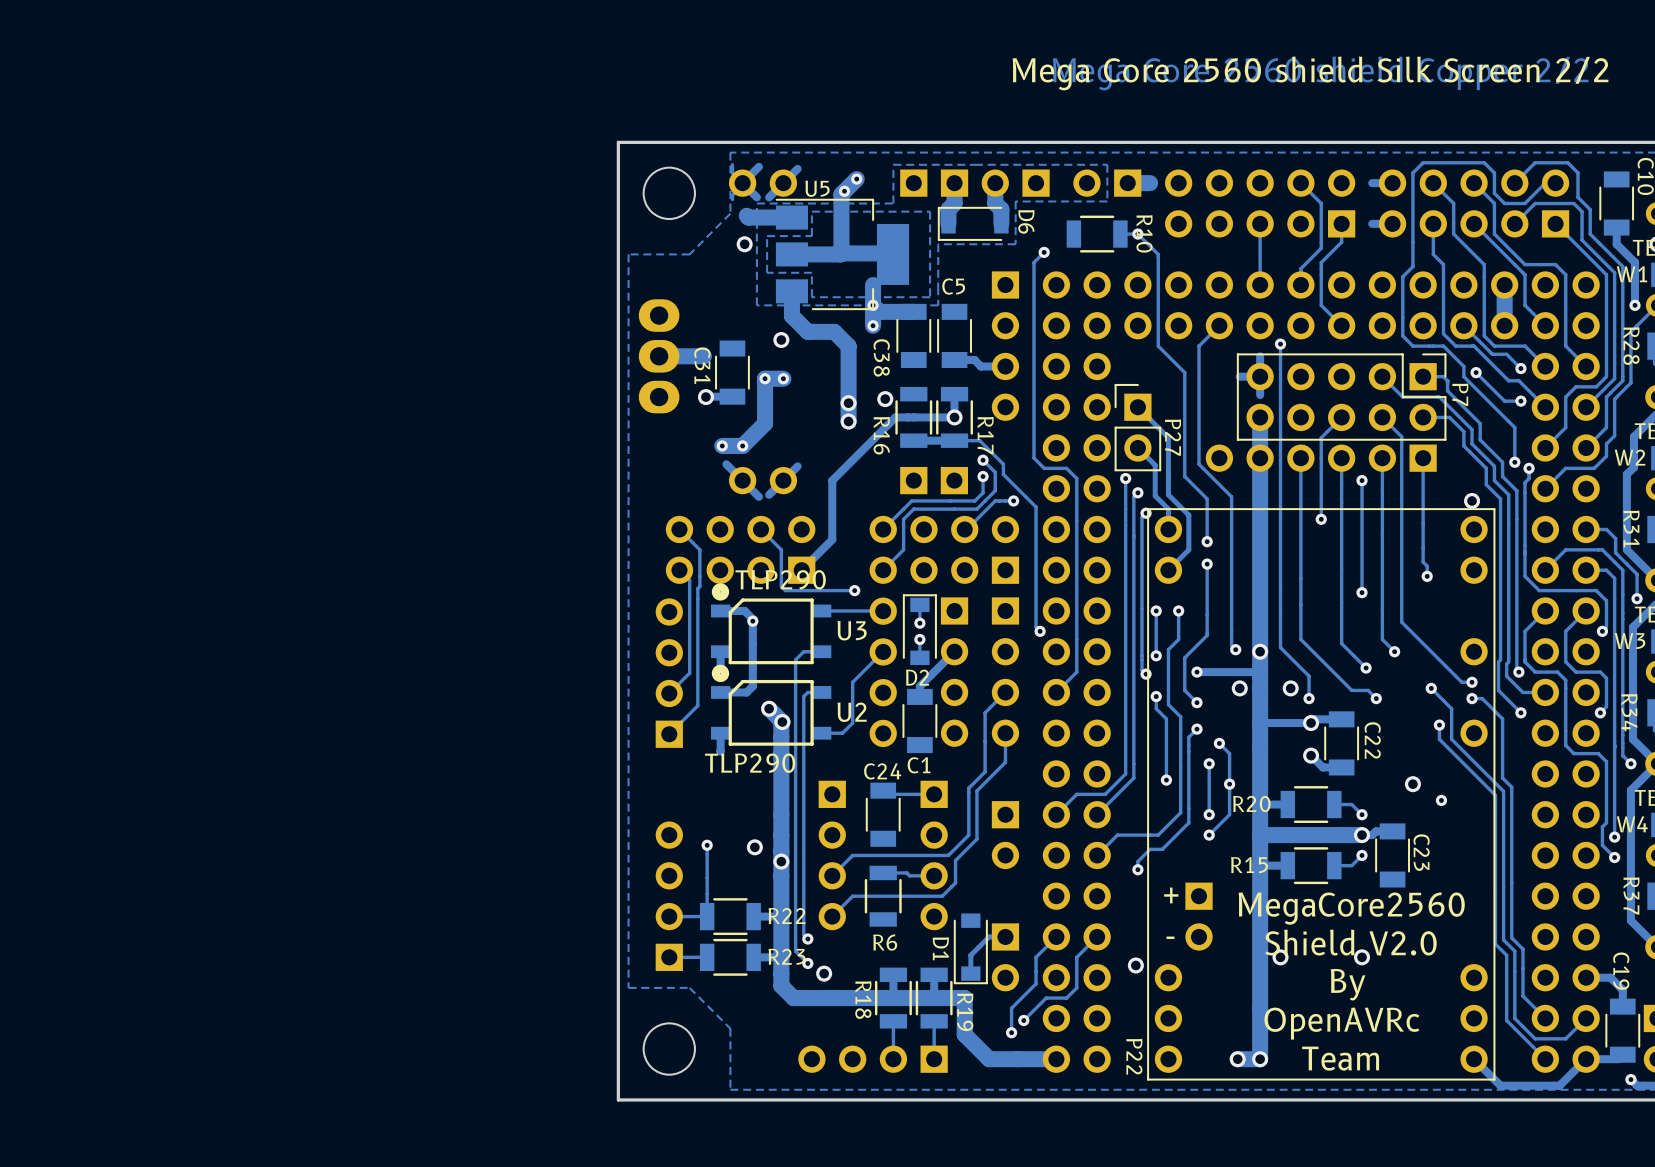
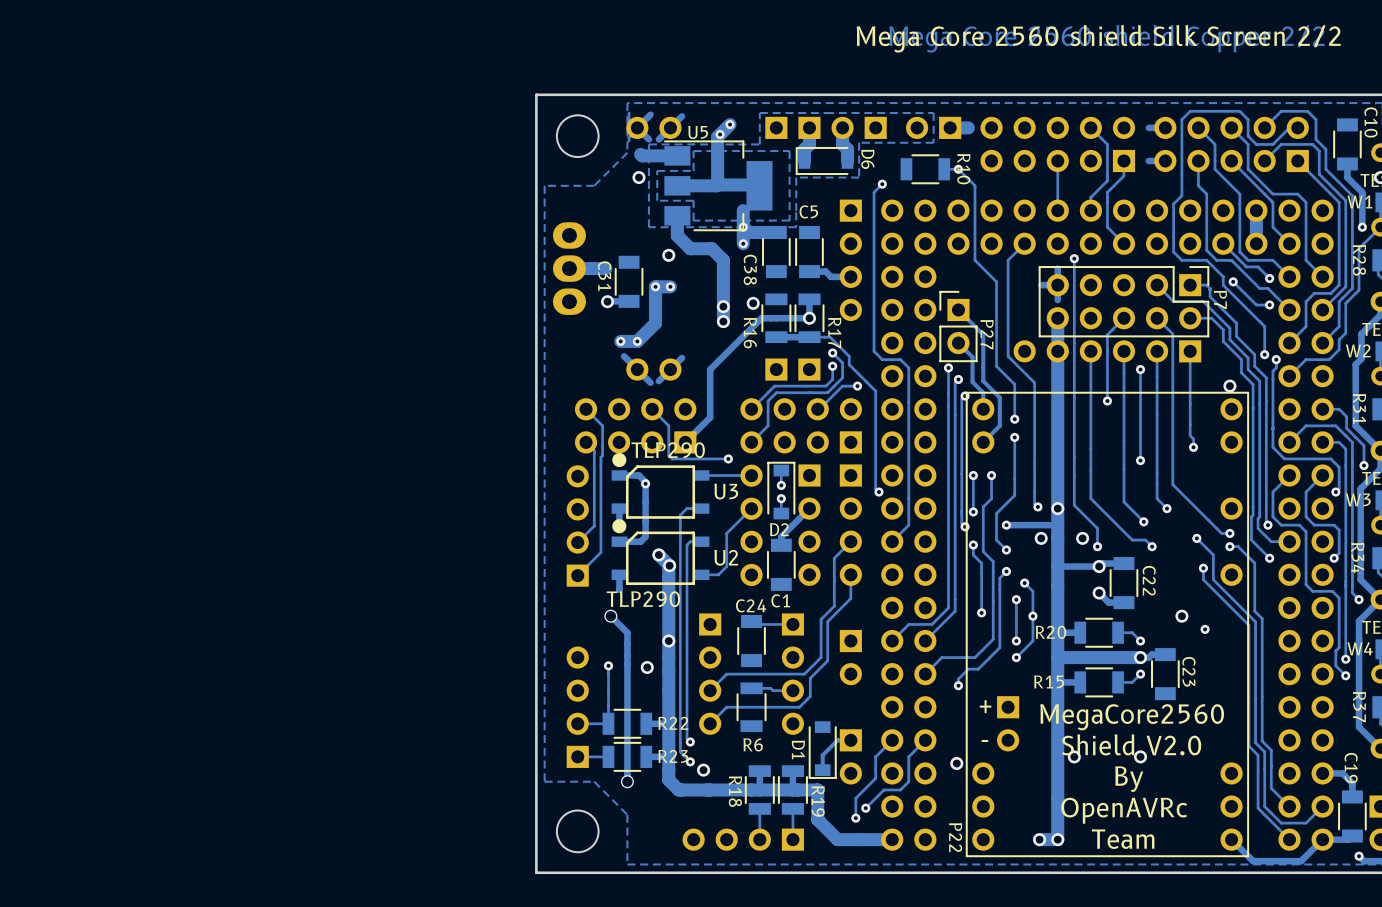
track: none -> (610, 616) (627, 632) (627, 781)
via: none -> (610, 616)
via position: (781, 861) -> (668, 641)
via: none -> (627, 781)

